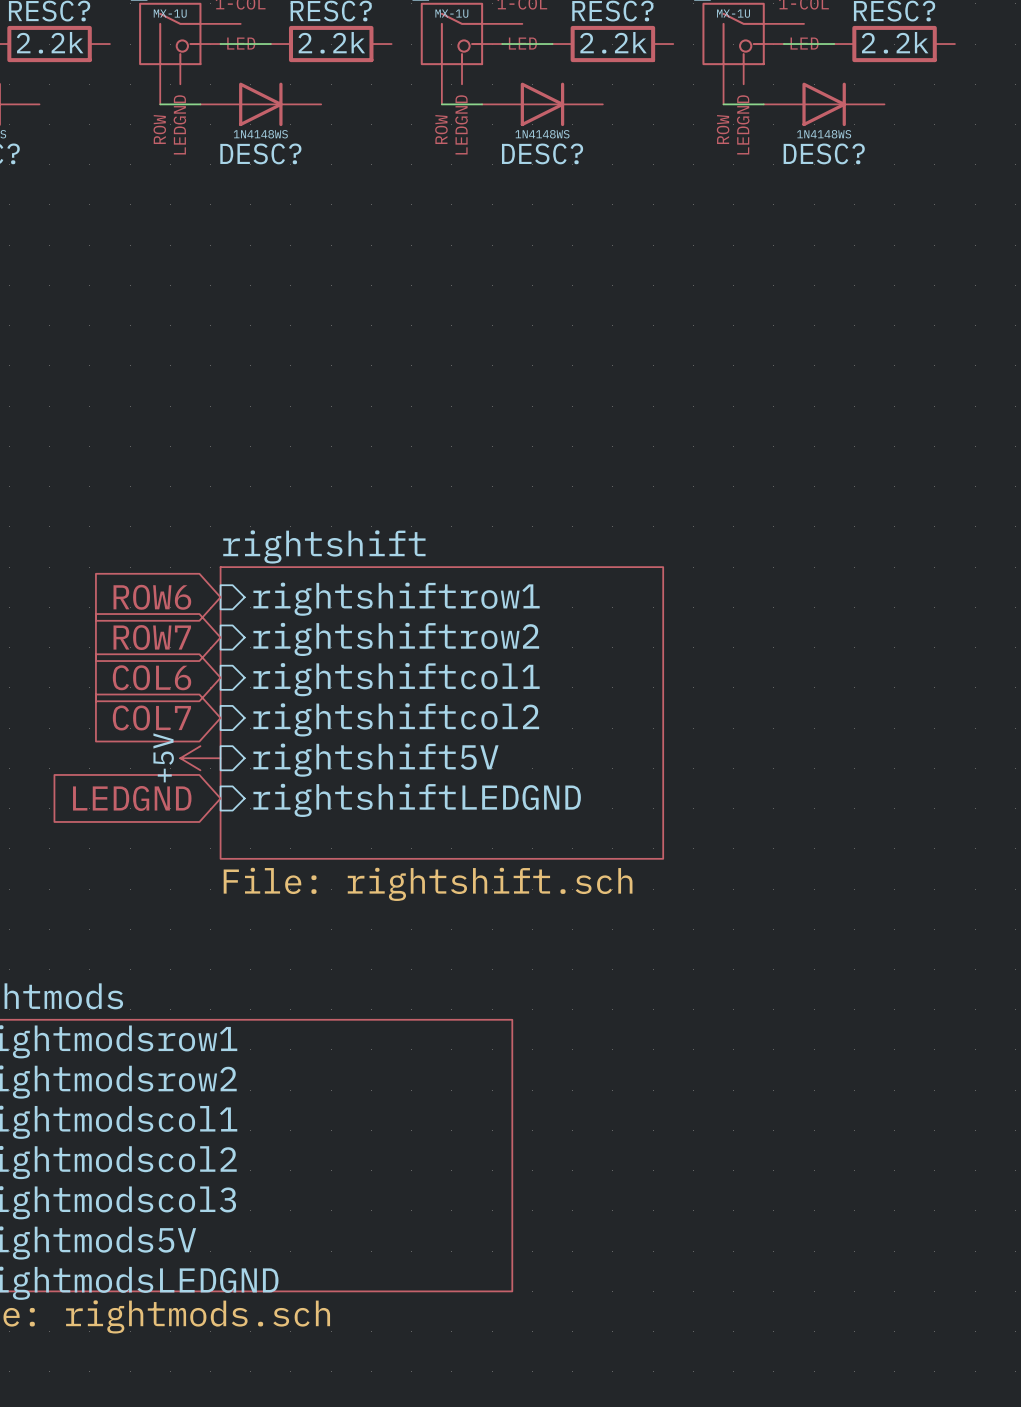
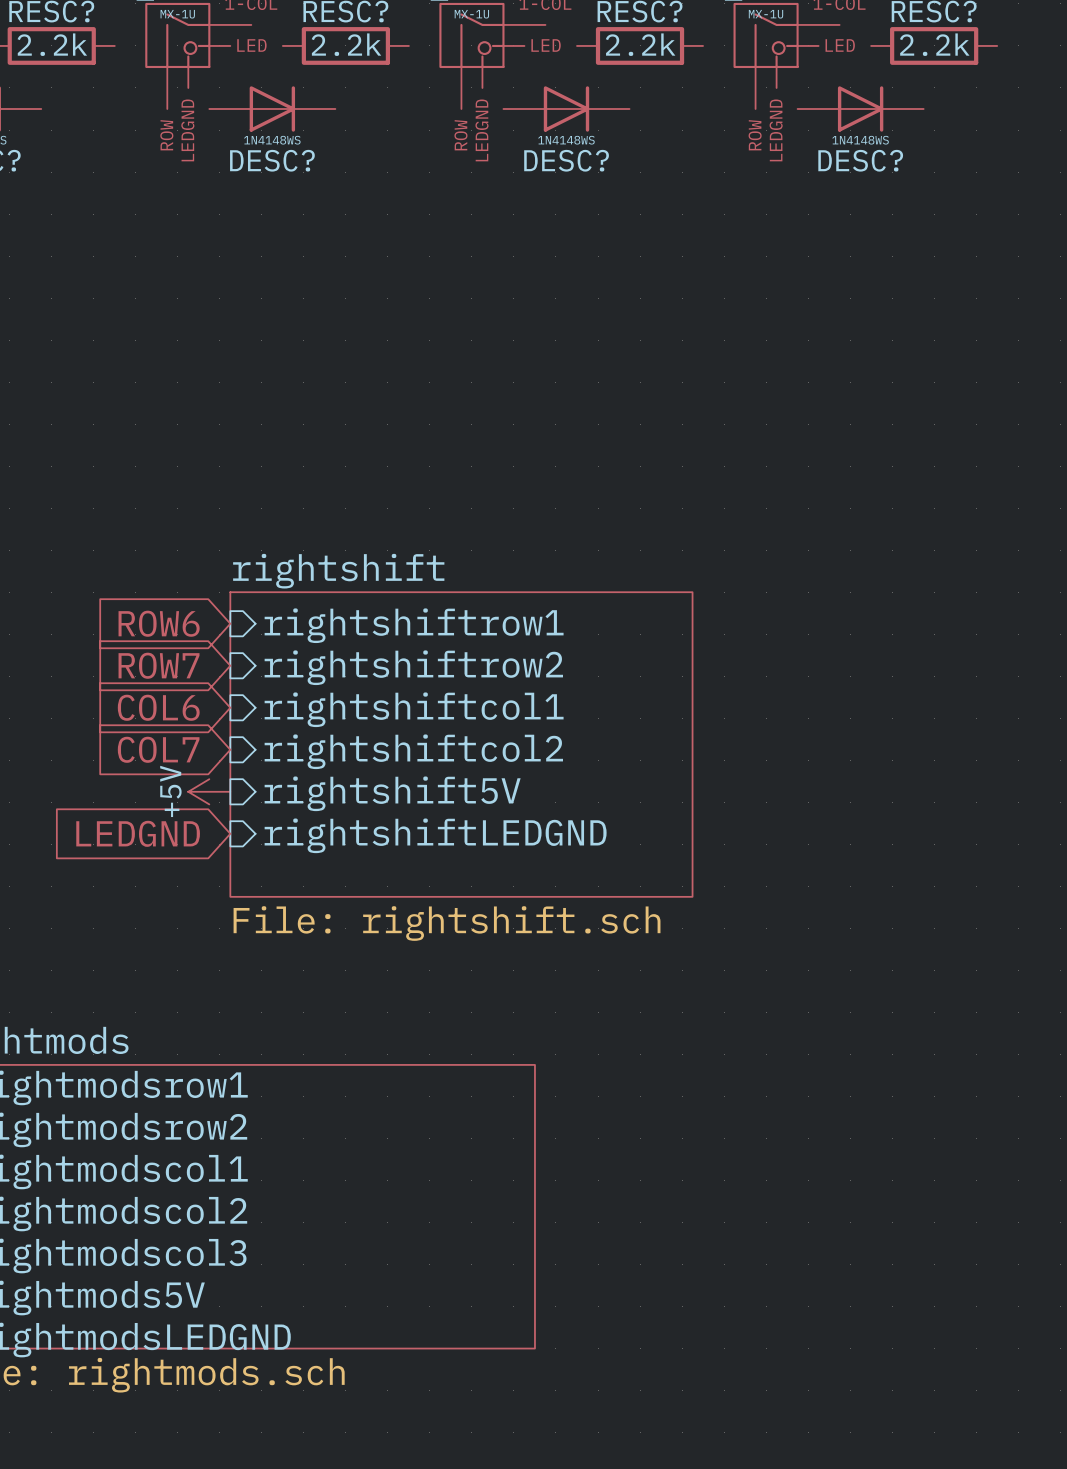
wire: (220, 44) (270, 44) -> none
wire: (502, 44) (552, 44) -> none
wire: (783, 44) (834, 44) -> none
wire: (160, 104) (200, 104) -> none
wire: (441, 104) (482, 104) -> none
wire: (723, 104) (763, 104) -> none

